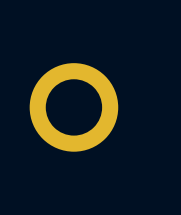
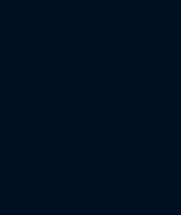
part: (73, 107) -> none

